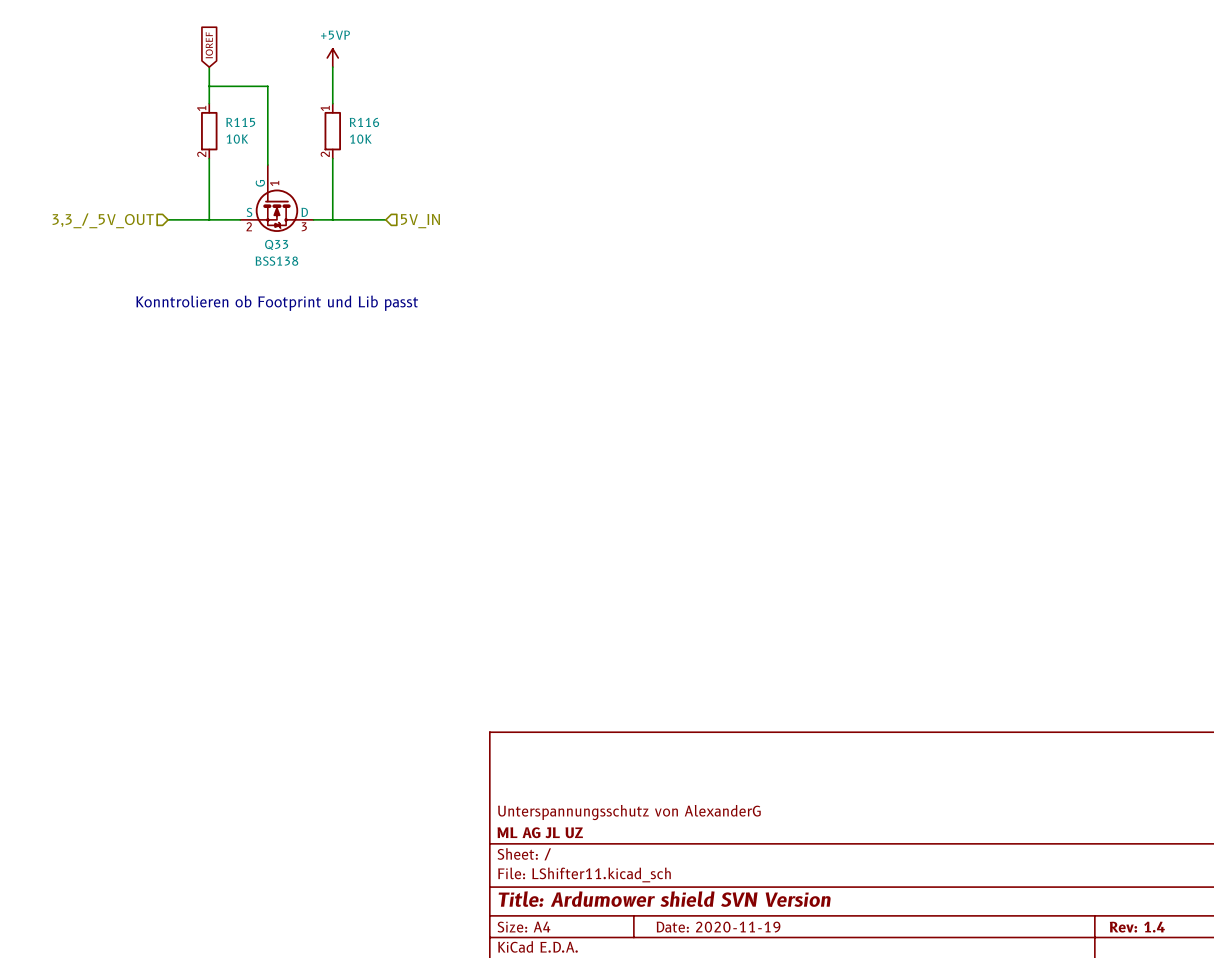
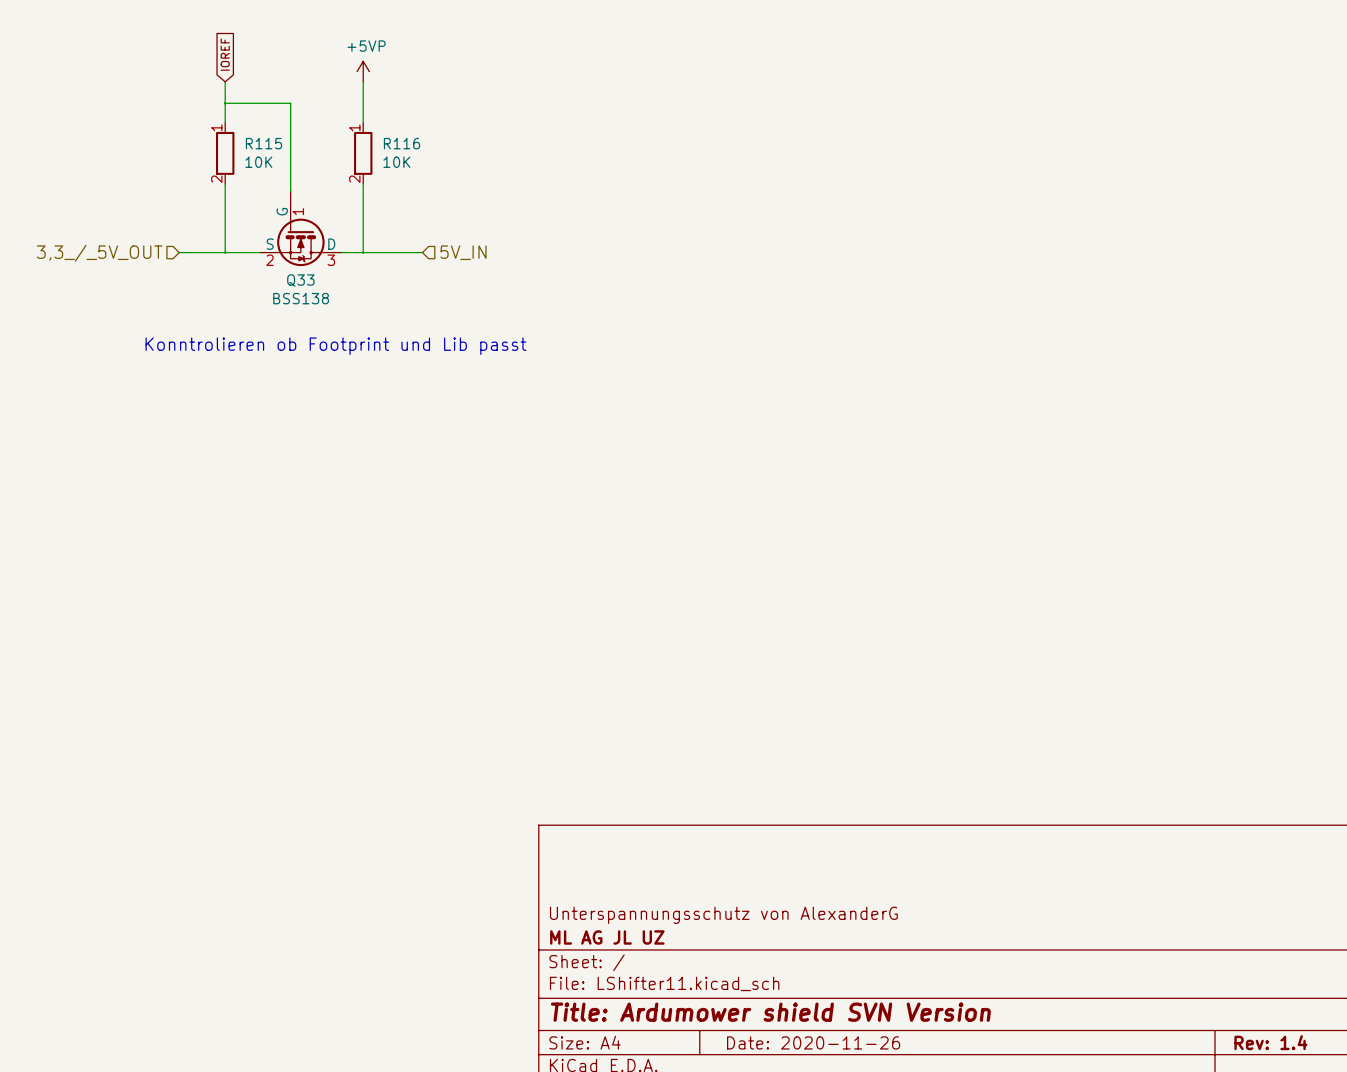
title block: Date: 2020-11-19 (718, 927) -> Date: 2020-11-26 (813, 1042)

